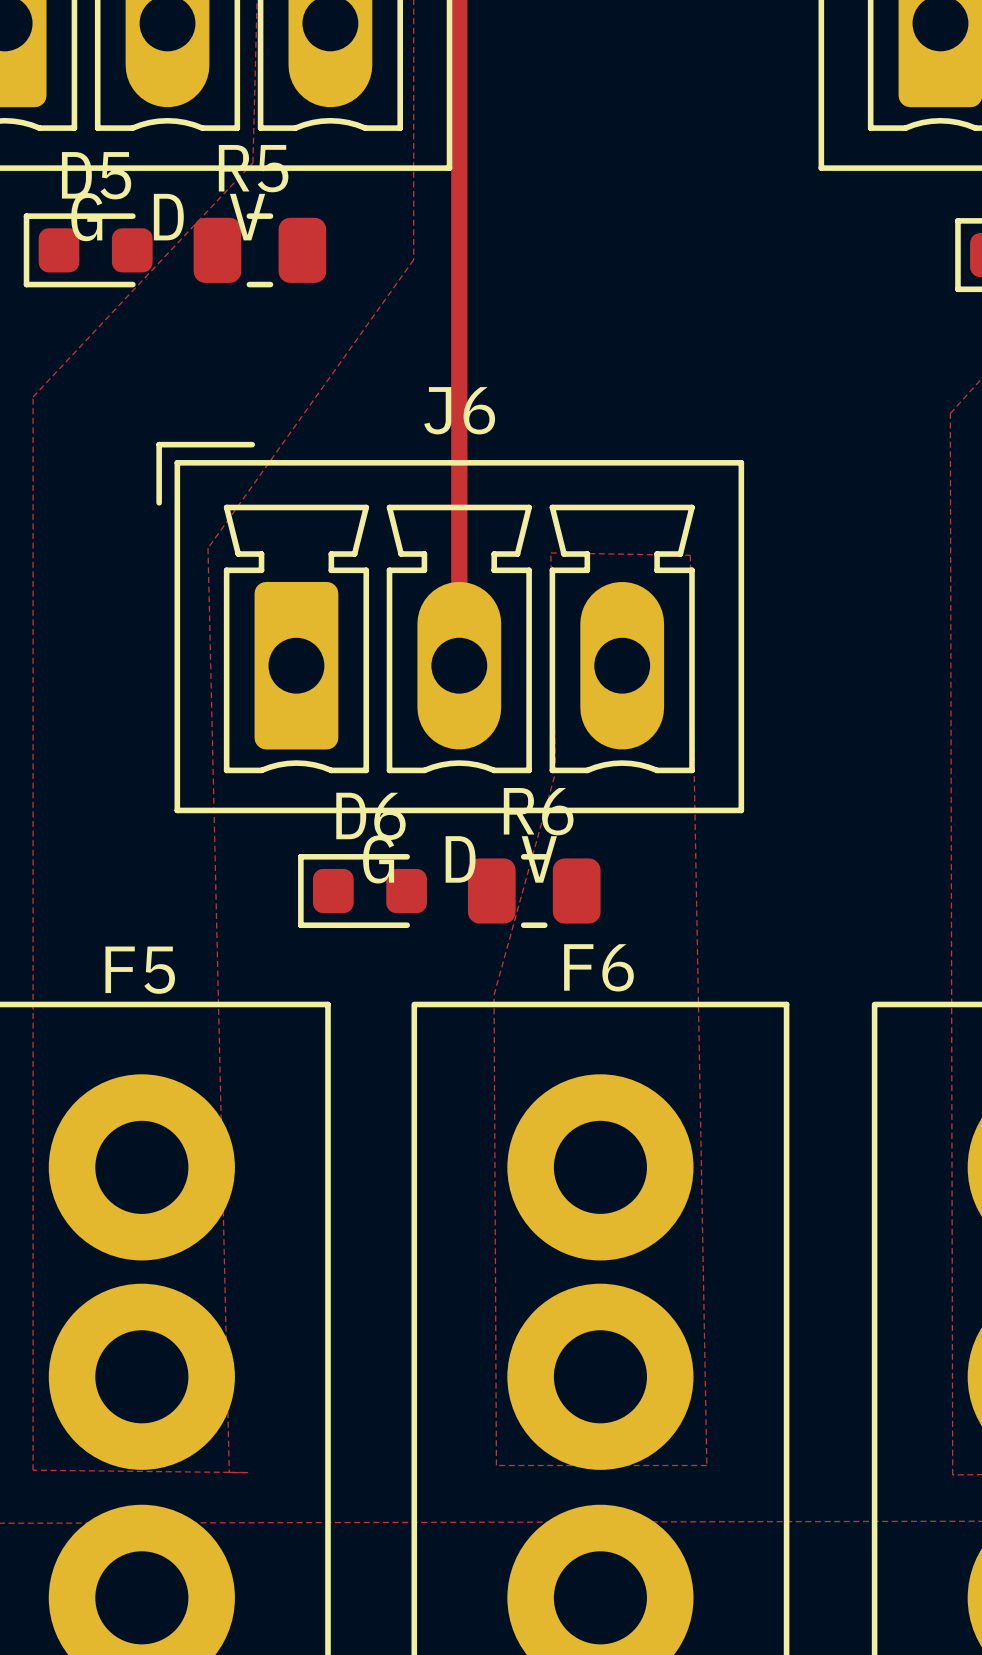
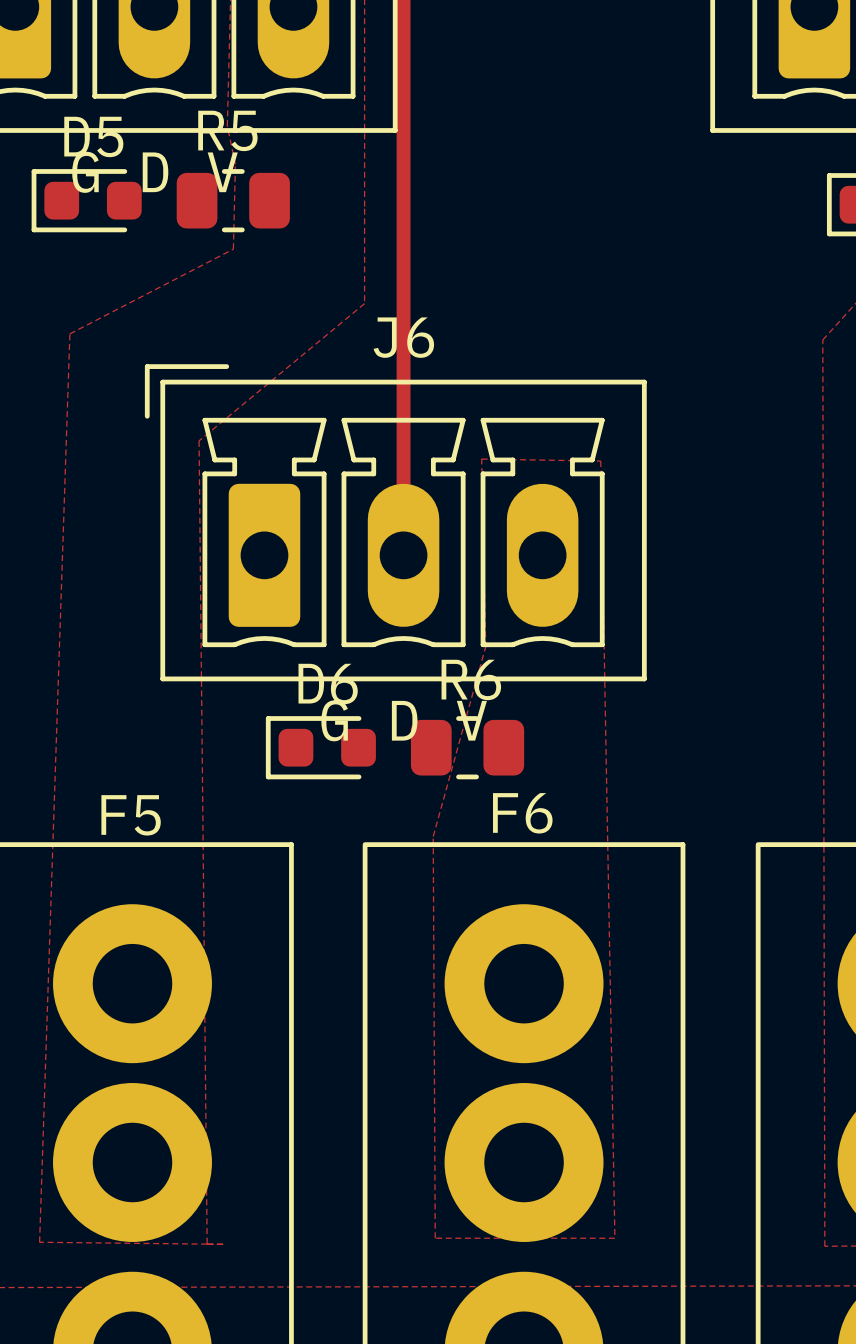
zone outline: (252, 162) (33, 396) (33, 1470) -> (227, 125) (235, 164) (233, 249) (69, 333) (39, 1242)
zone outline: (413, 259) (208, 548) (229, 1472) -> (364, 208) (364, 303) (199, 440) (207, 1244)

